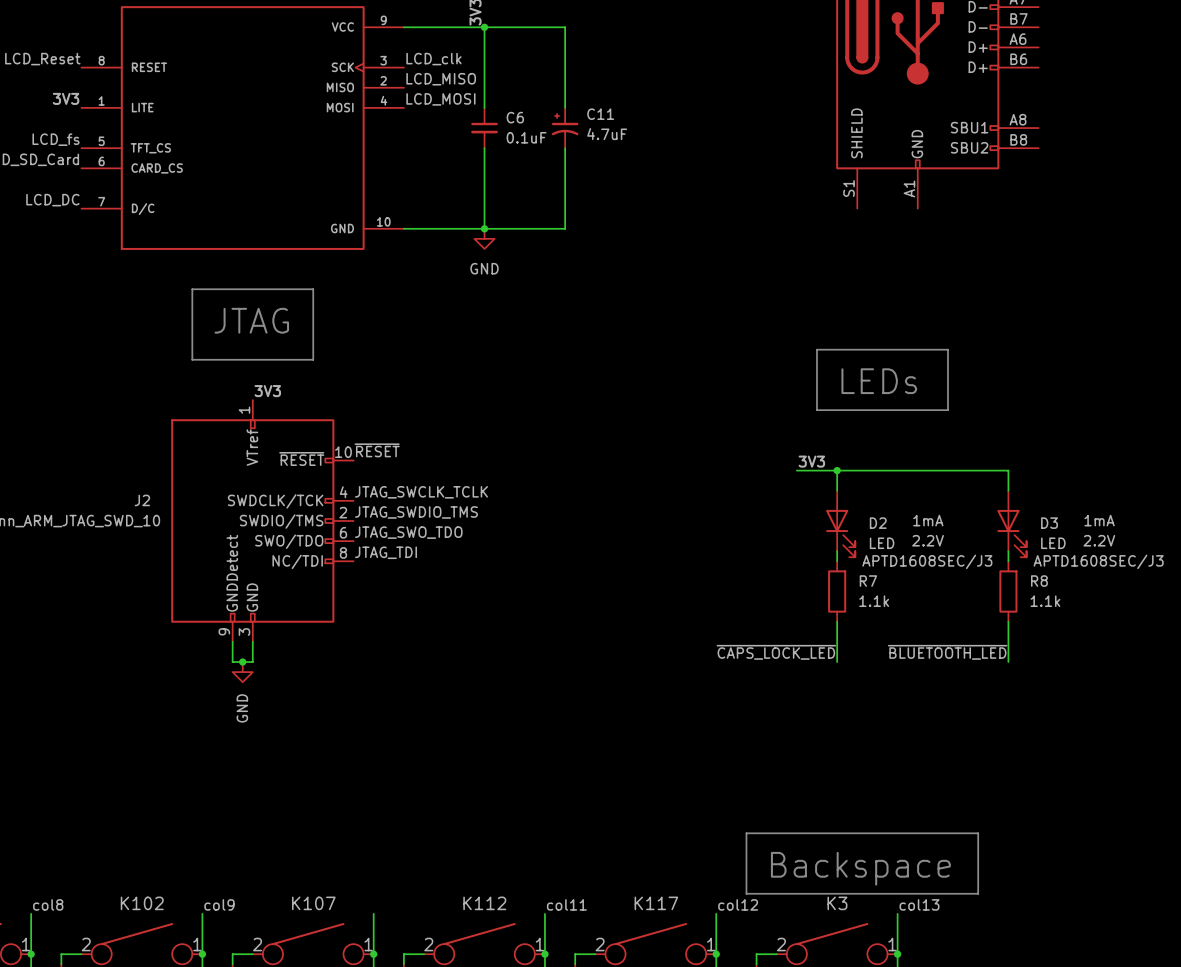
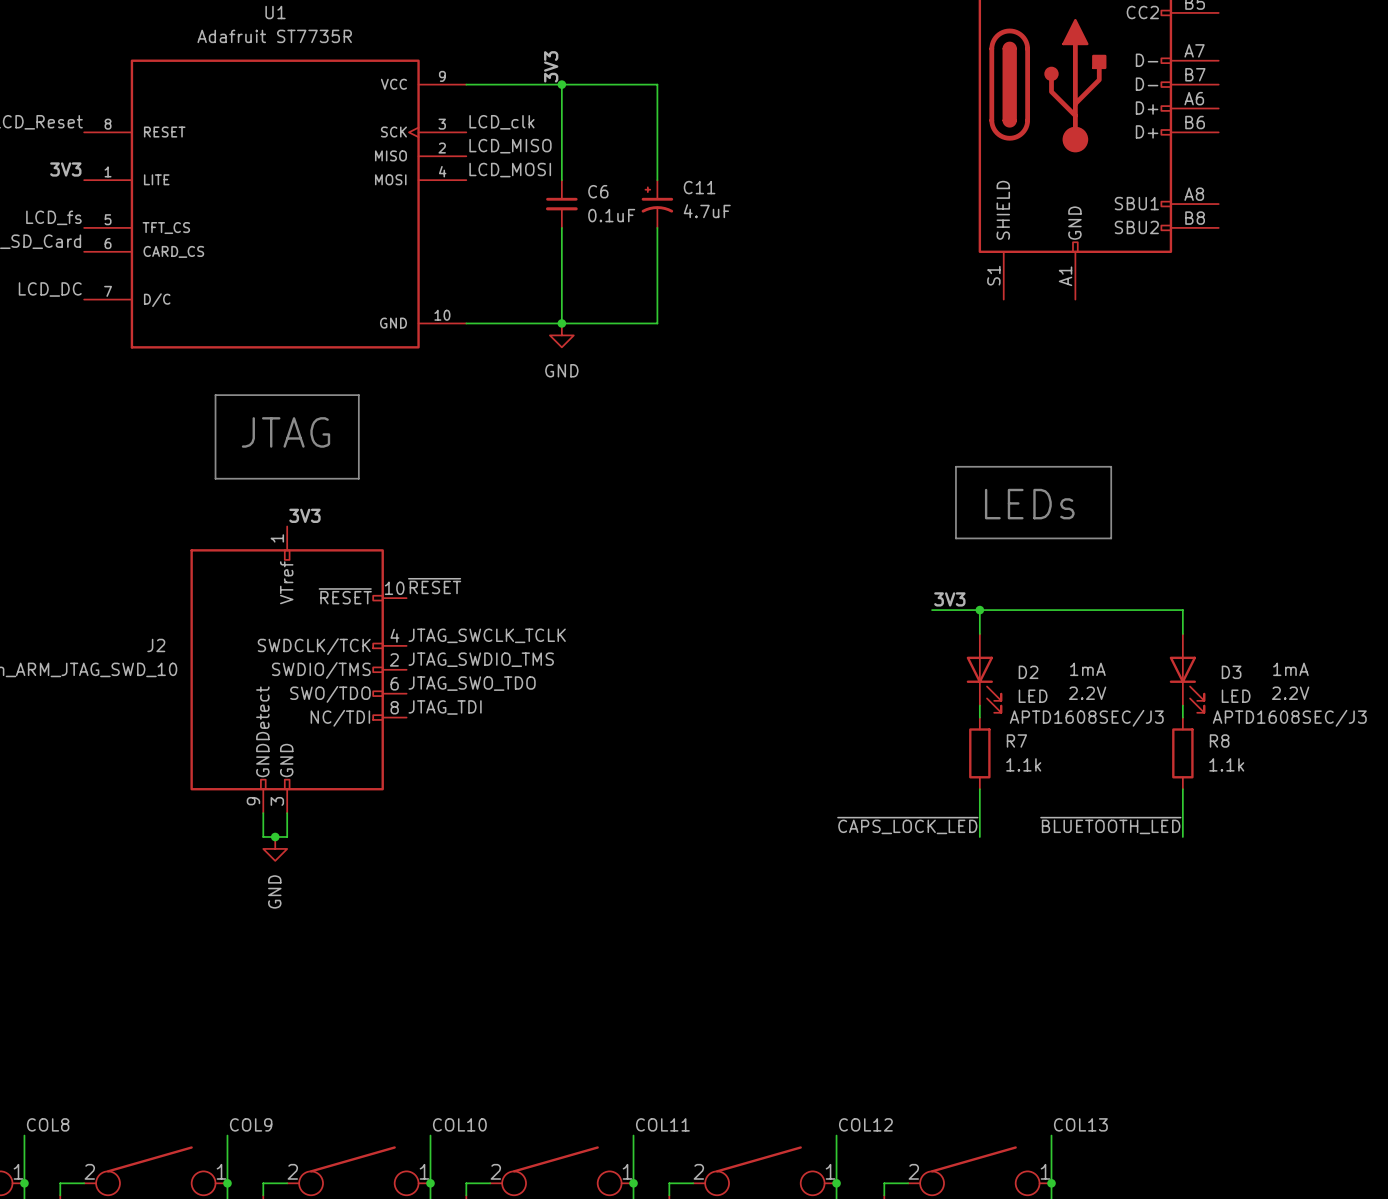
line: (746, 833) (978, 833) (978, 893) (746, 893) (746, 833) -> none
text: Backspace (860, 868) -> none
K102 name: K102 (142, 903) -> none
K107 name: K107 (313, 903) -> none
K112 name: K112 (484, 903) -> none
K117 name: K117 (656, 903) -> none
K3 name: K3 (837, 903) -> none
label: col8 (48, 904) -> COL8 (48, 1124)
label: col9 (219, 904) -> COL9 (251, 1124)
label: none -> COL10 (459, 1124)
label: col11 (566, 904) -> COL11 (662, 1124)
label: col12 (738, 904) -> COL12 (865, 1124)
label: col13 (919, 904) -> COL13 (1080, 1124)

